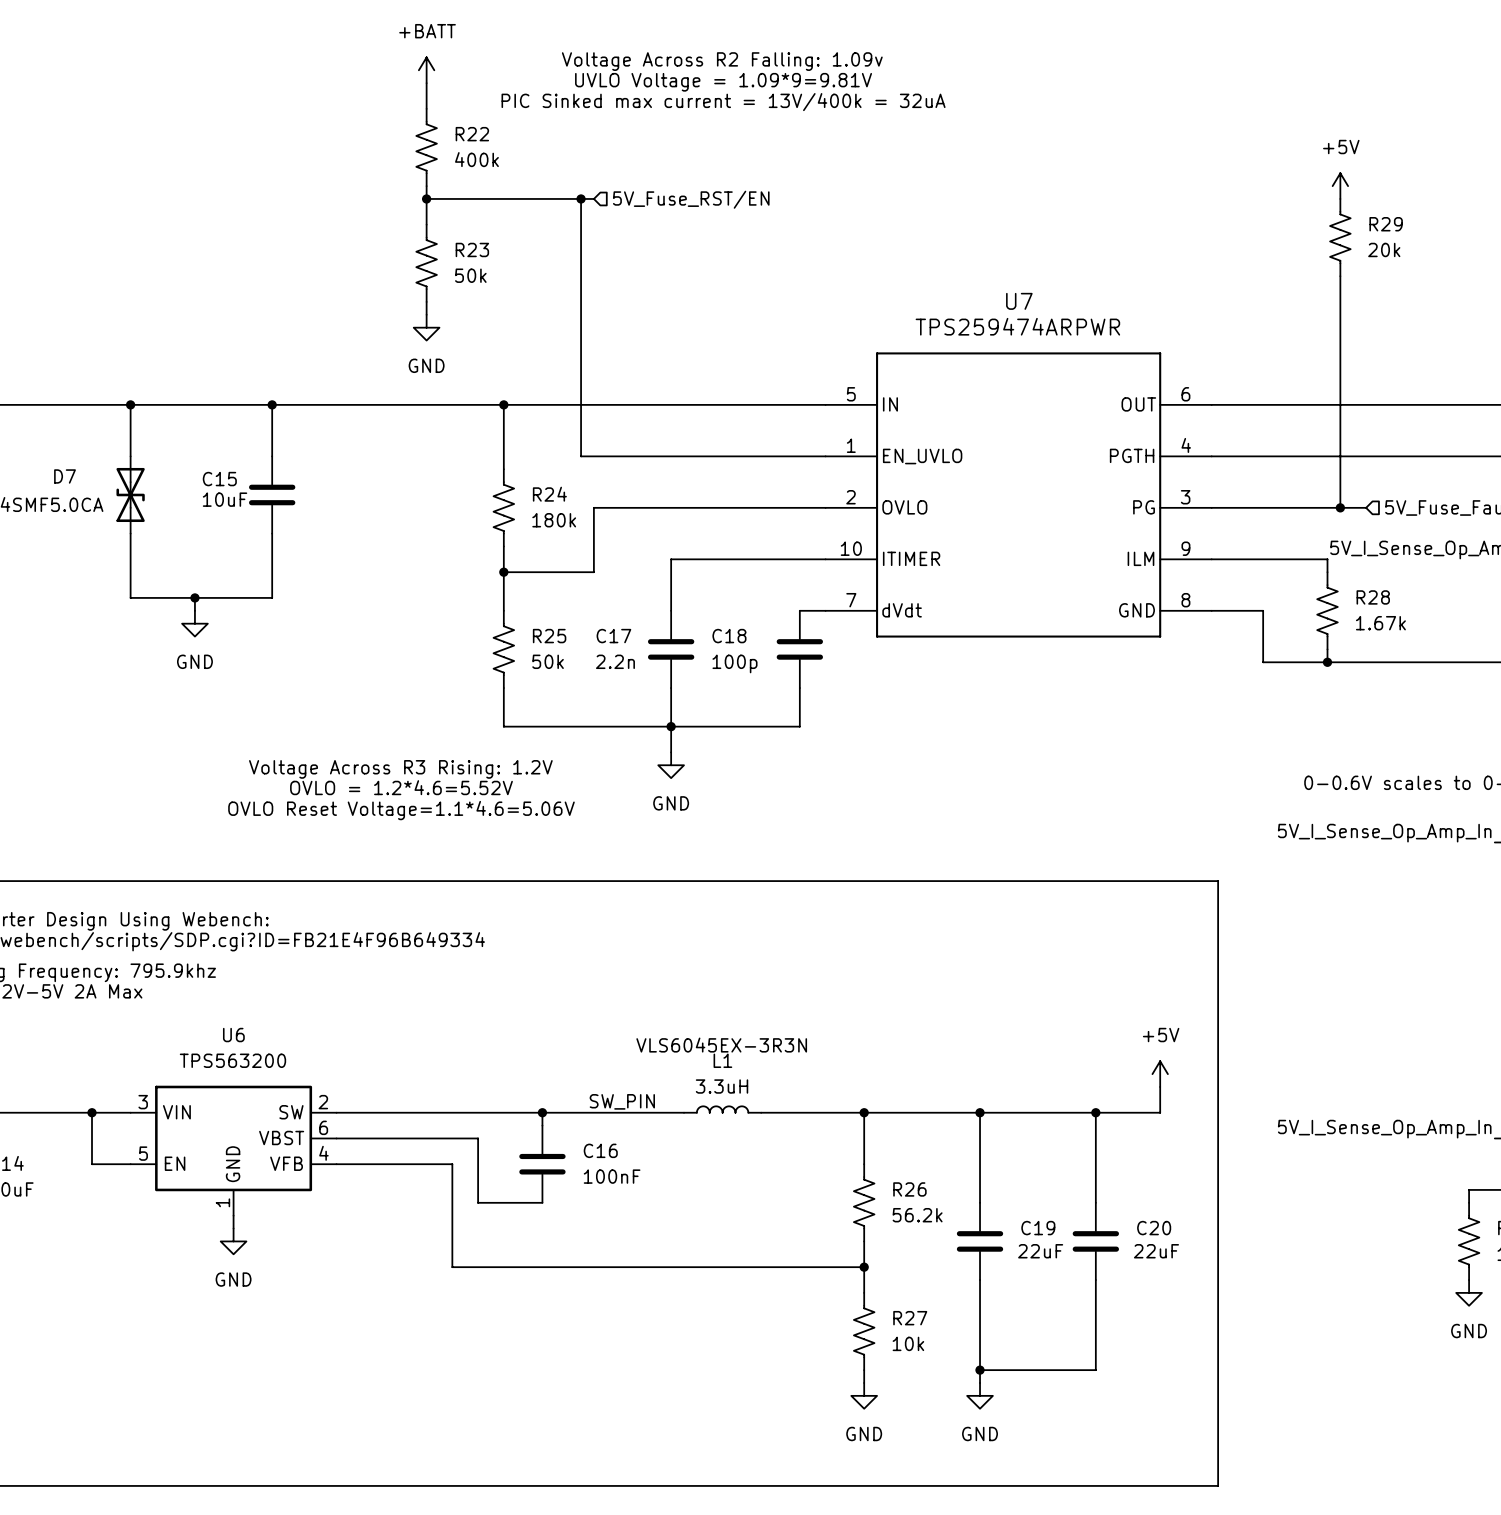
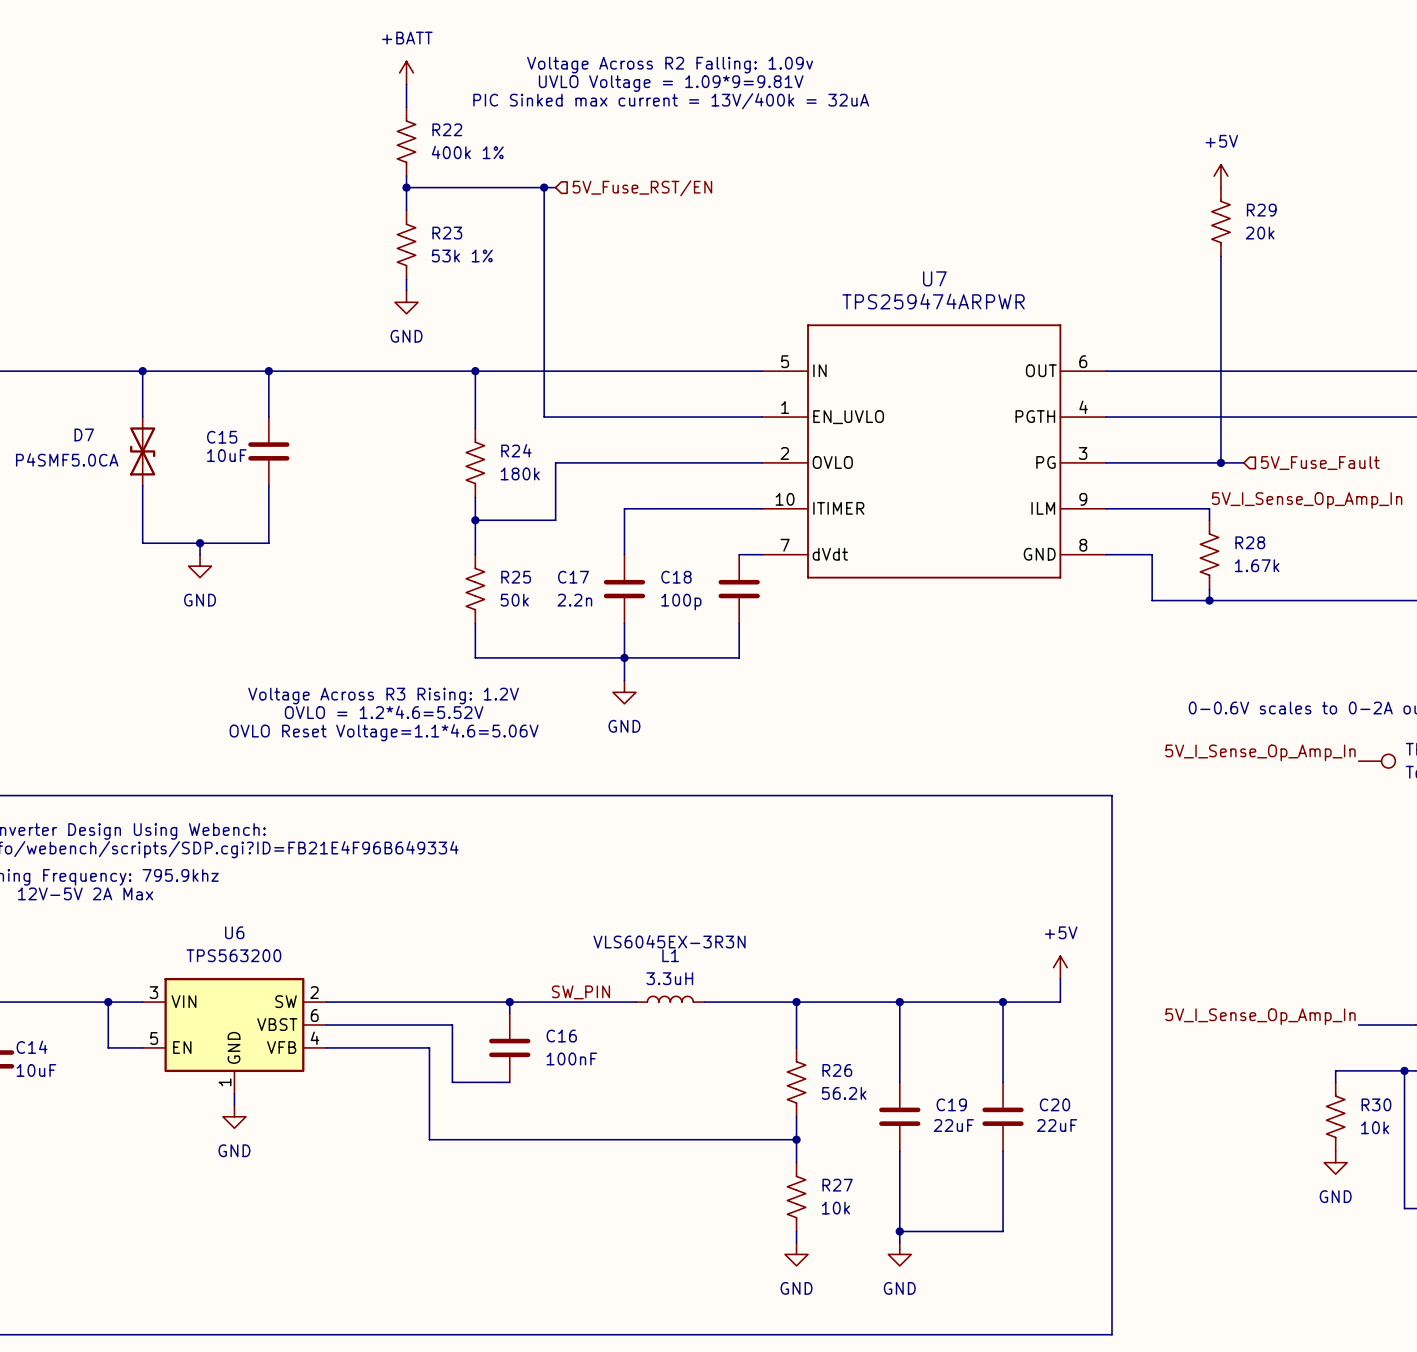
R22 value: 400k (476, 159) -> 400k 1% (467, 152)
R23 value: 50k (470, 275) -> 53k 1% (462, 256)

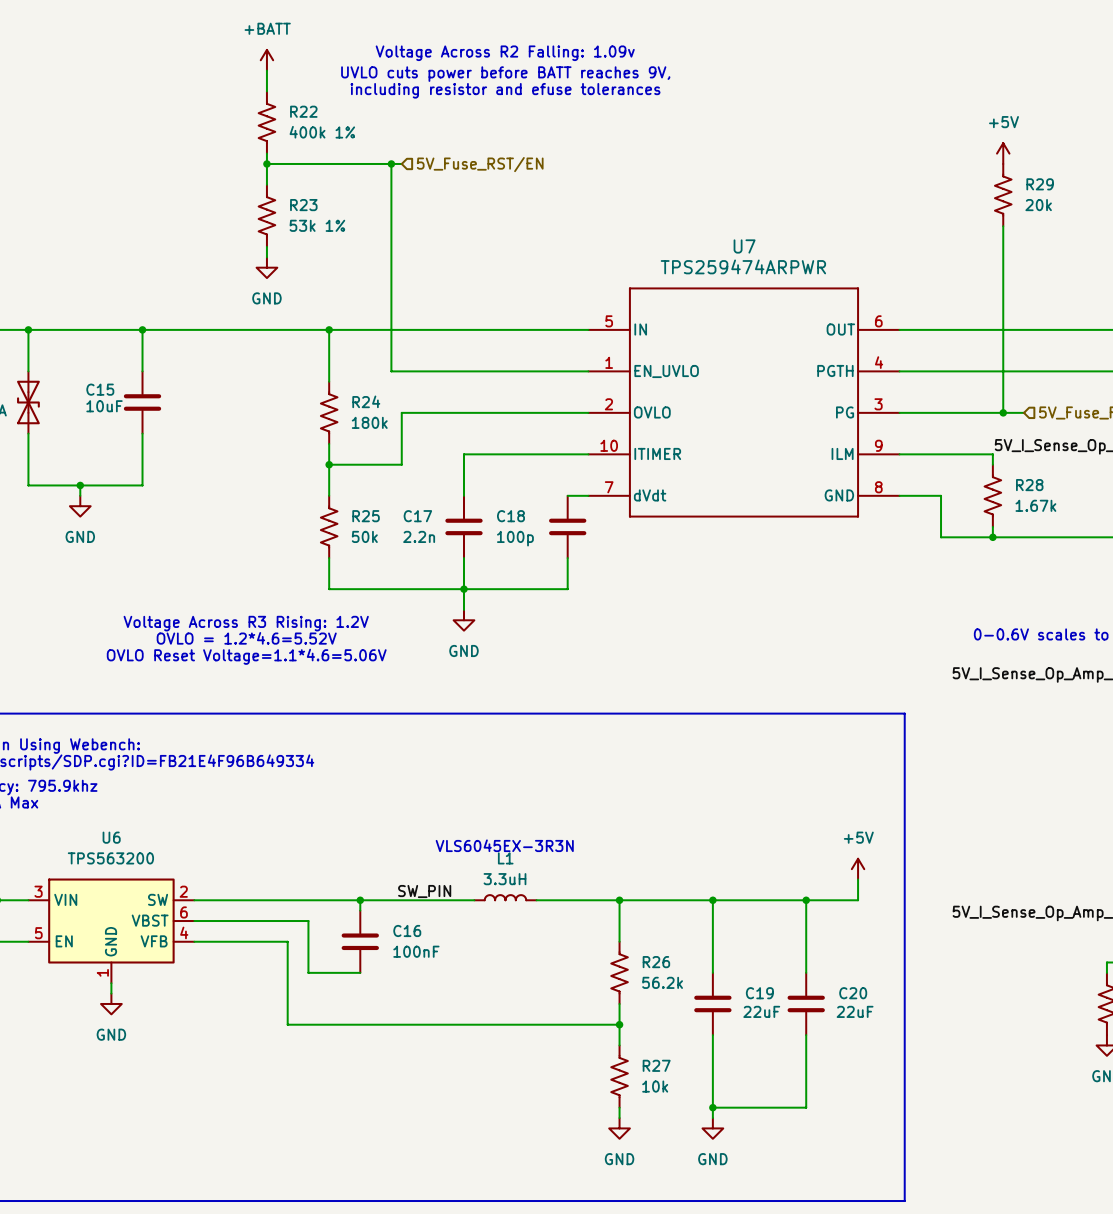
text: UVLO Voltage = 1.09*9=9.81V (671, 83) -> UVLO cuts power before BATT reaches 9V, (505, 74)
text: PIC Sinked max current = 13V/400k = 32uA (671, 101) -> including resistor and efuse tolerances (505, 90)

